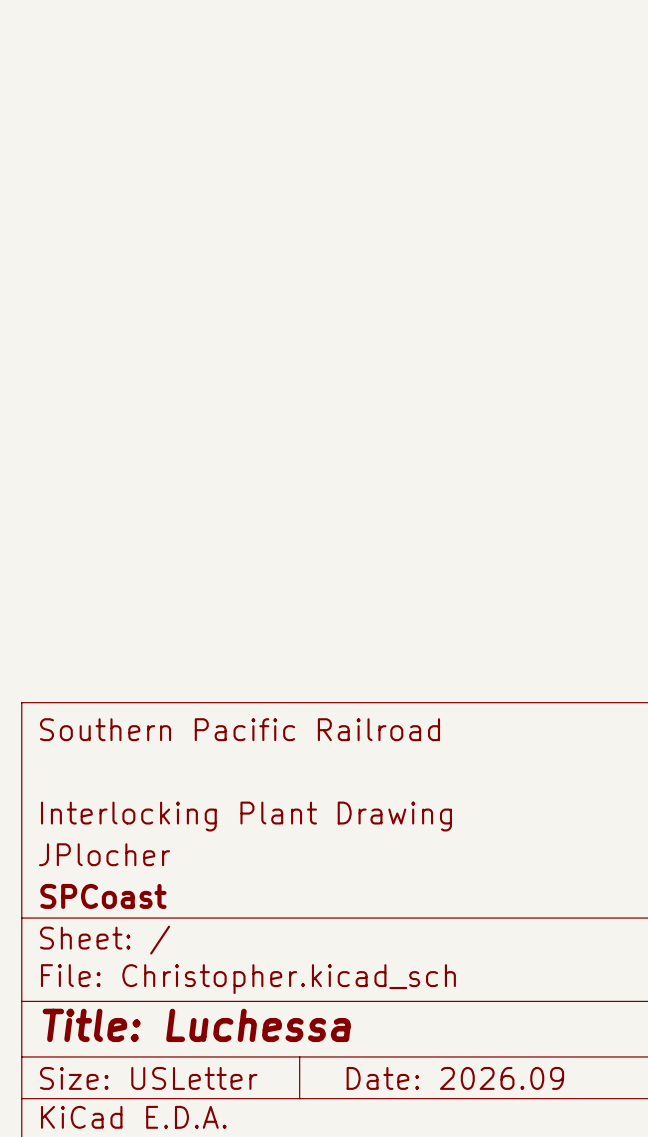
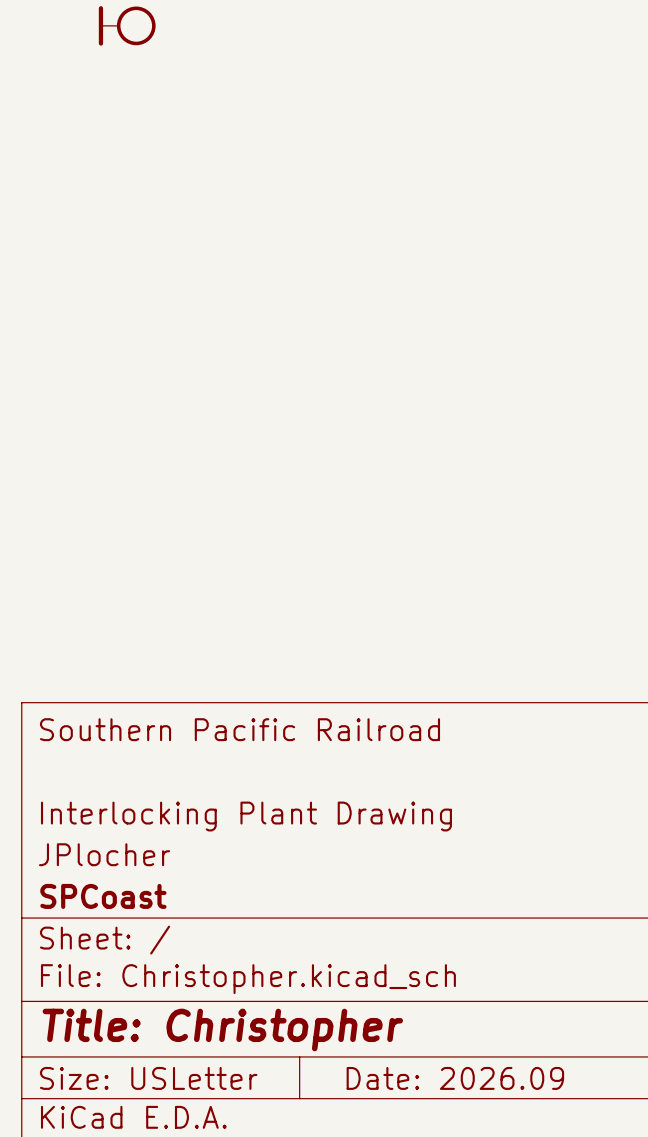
part: none -> (108, 25)
part: none -> (136, 25)
title block: Title: Luchessa (196, 1025) -> Title: Christopher (222, 1030)

